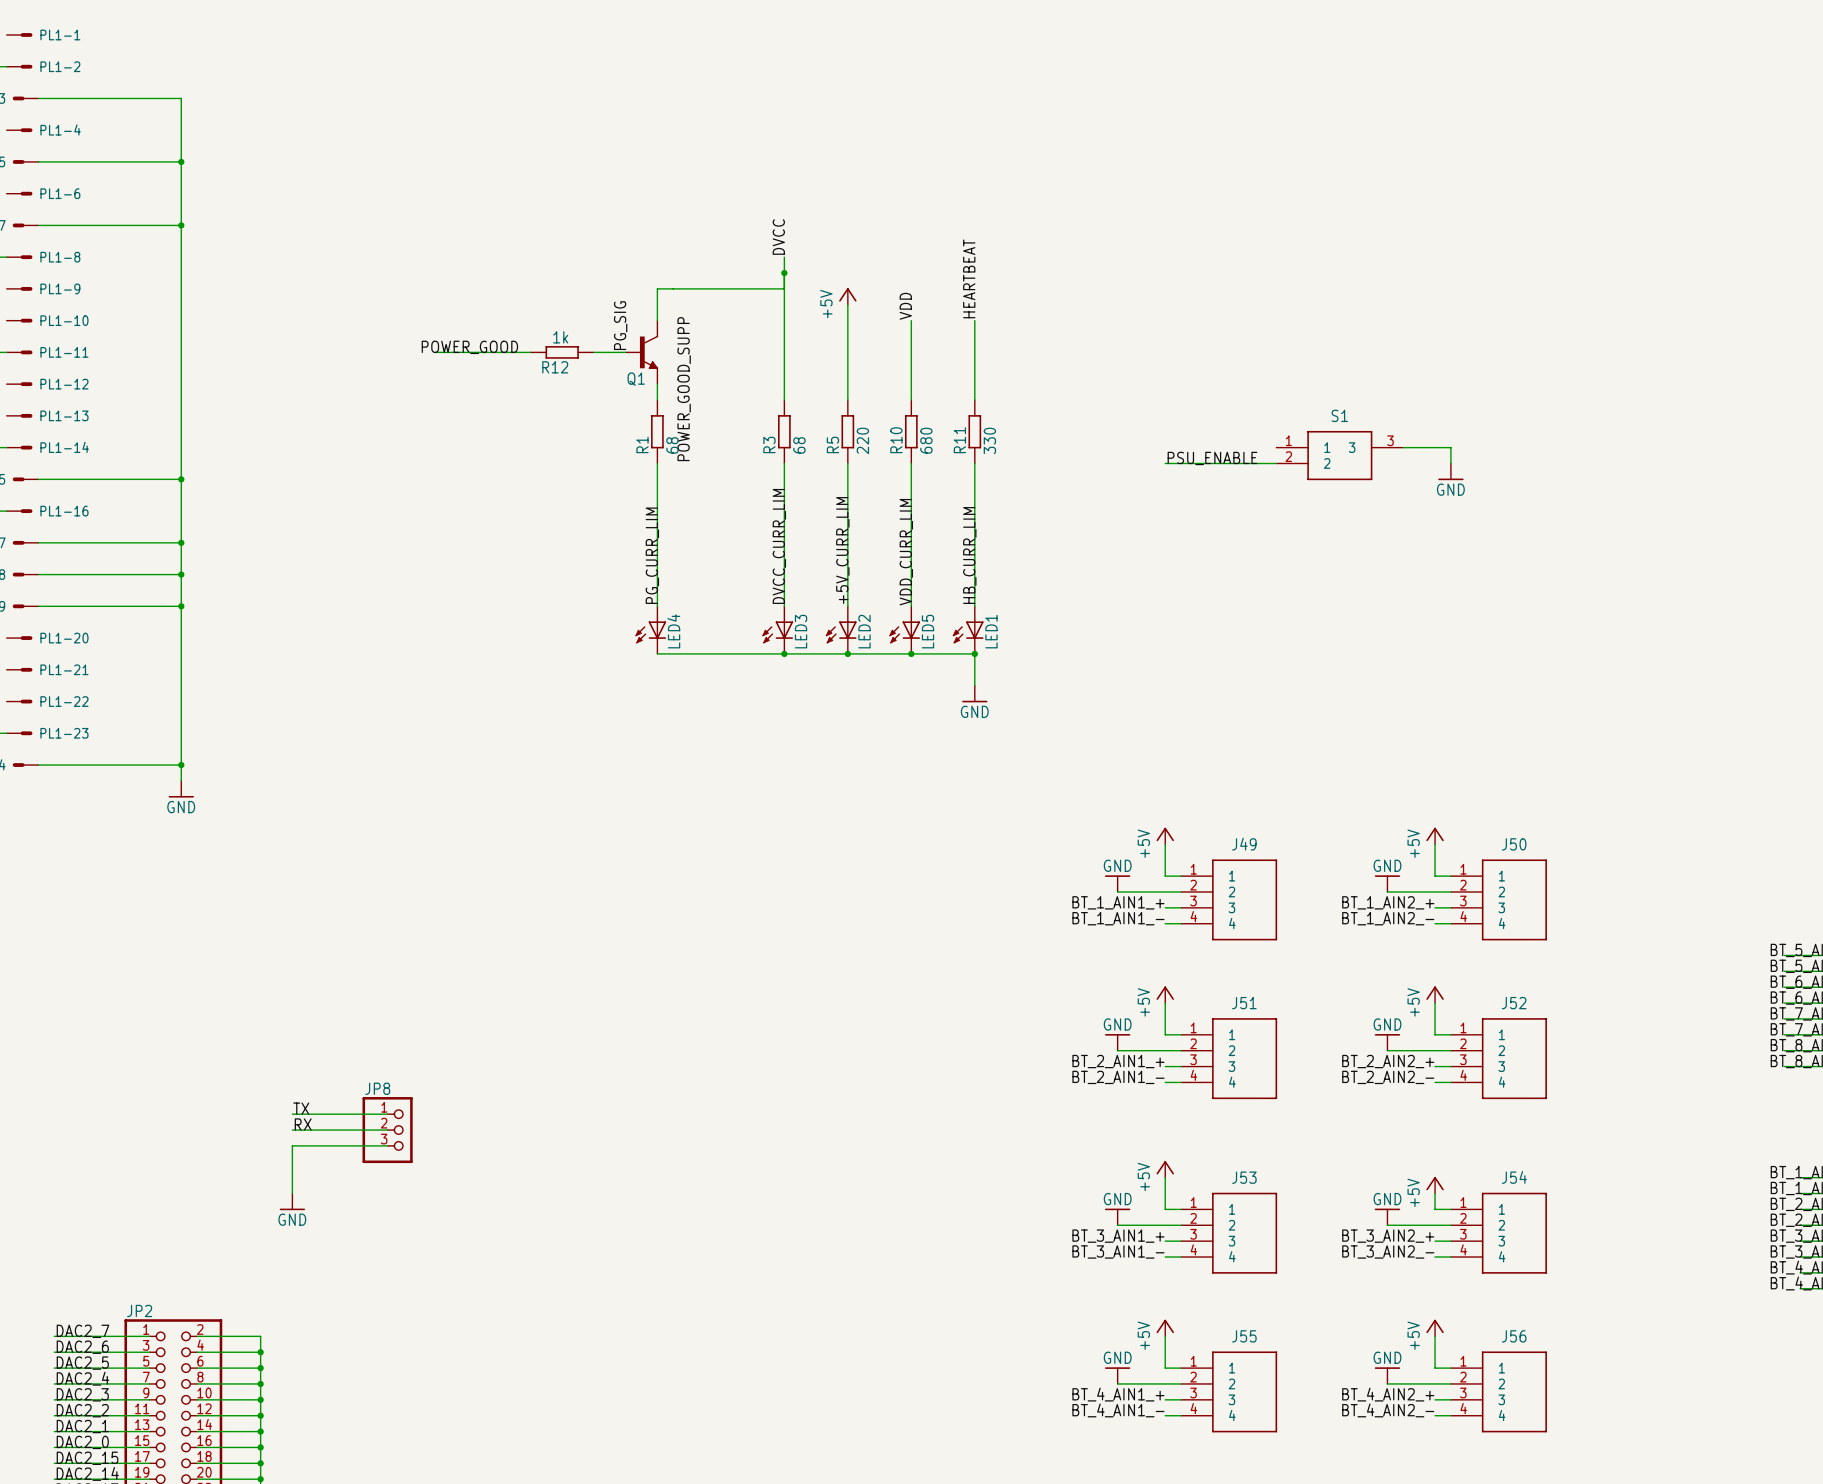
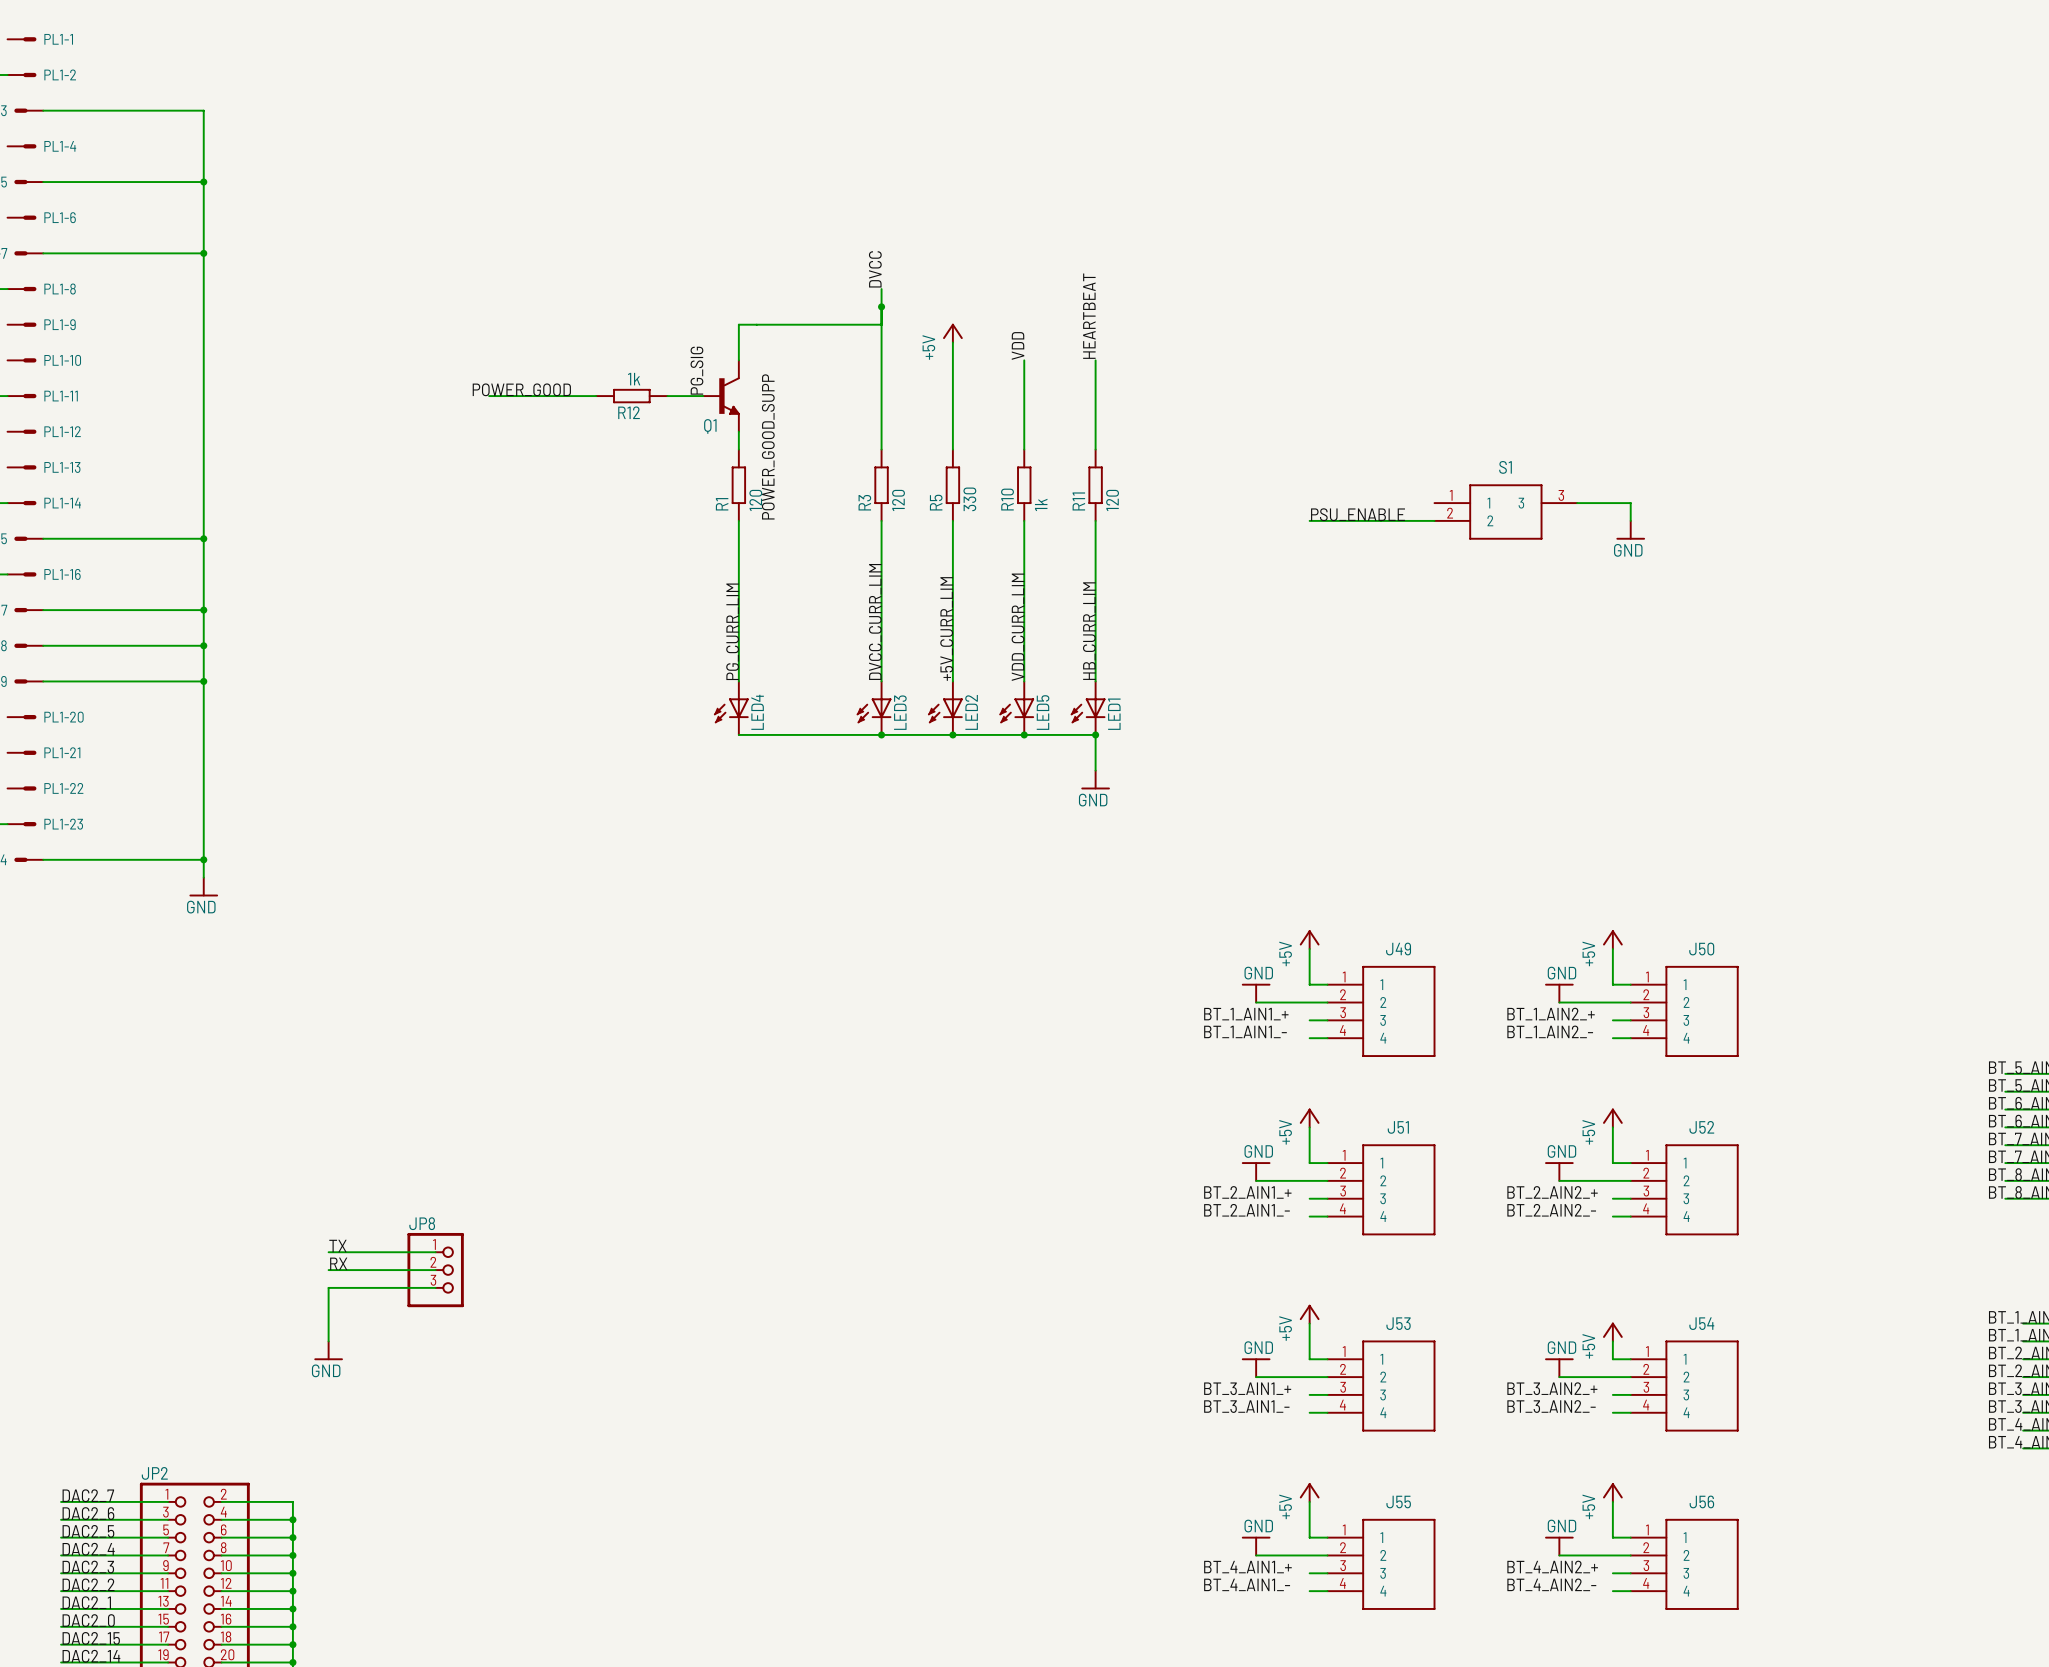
R5 value: 220 (862, 440) -> 330 (969, 499)
R10 value: 680 (926, 440) -> 1k (1041, 504)
R11 value: 330 (989, 440) -> 120 (1112, 500)
R1 value: 68 (672, 445) -> 120 (755, 500)
R3 value: 68 (799, 445) -> 120 (898, 500)

